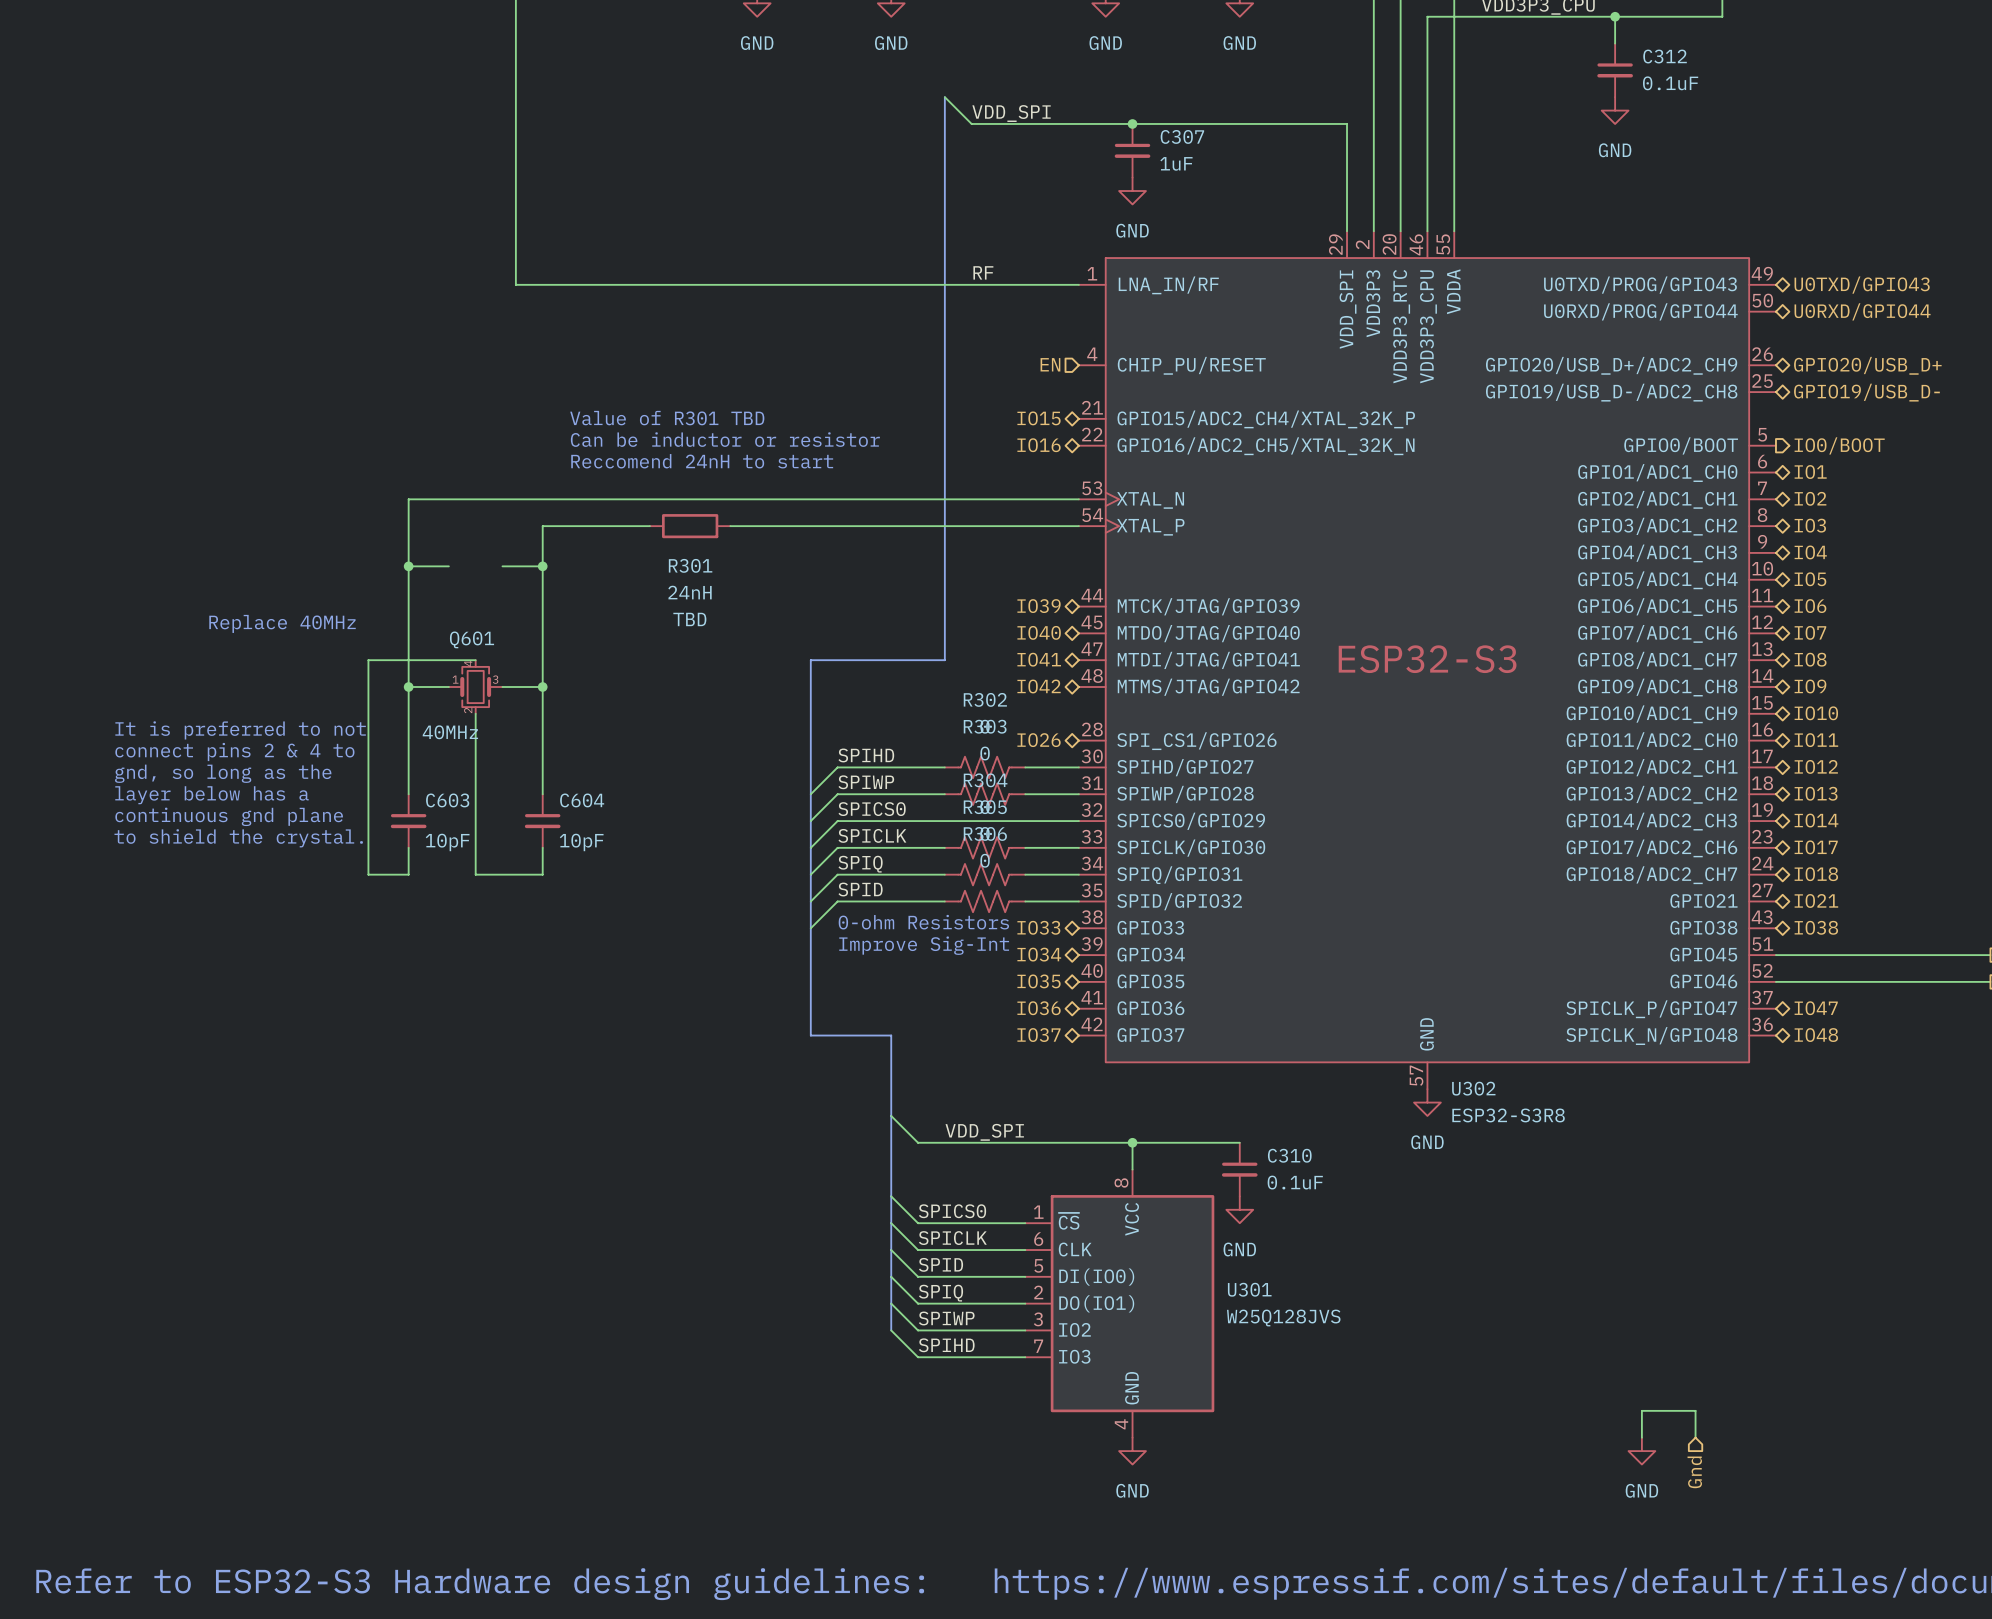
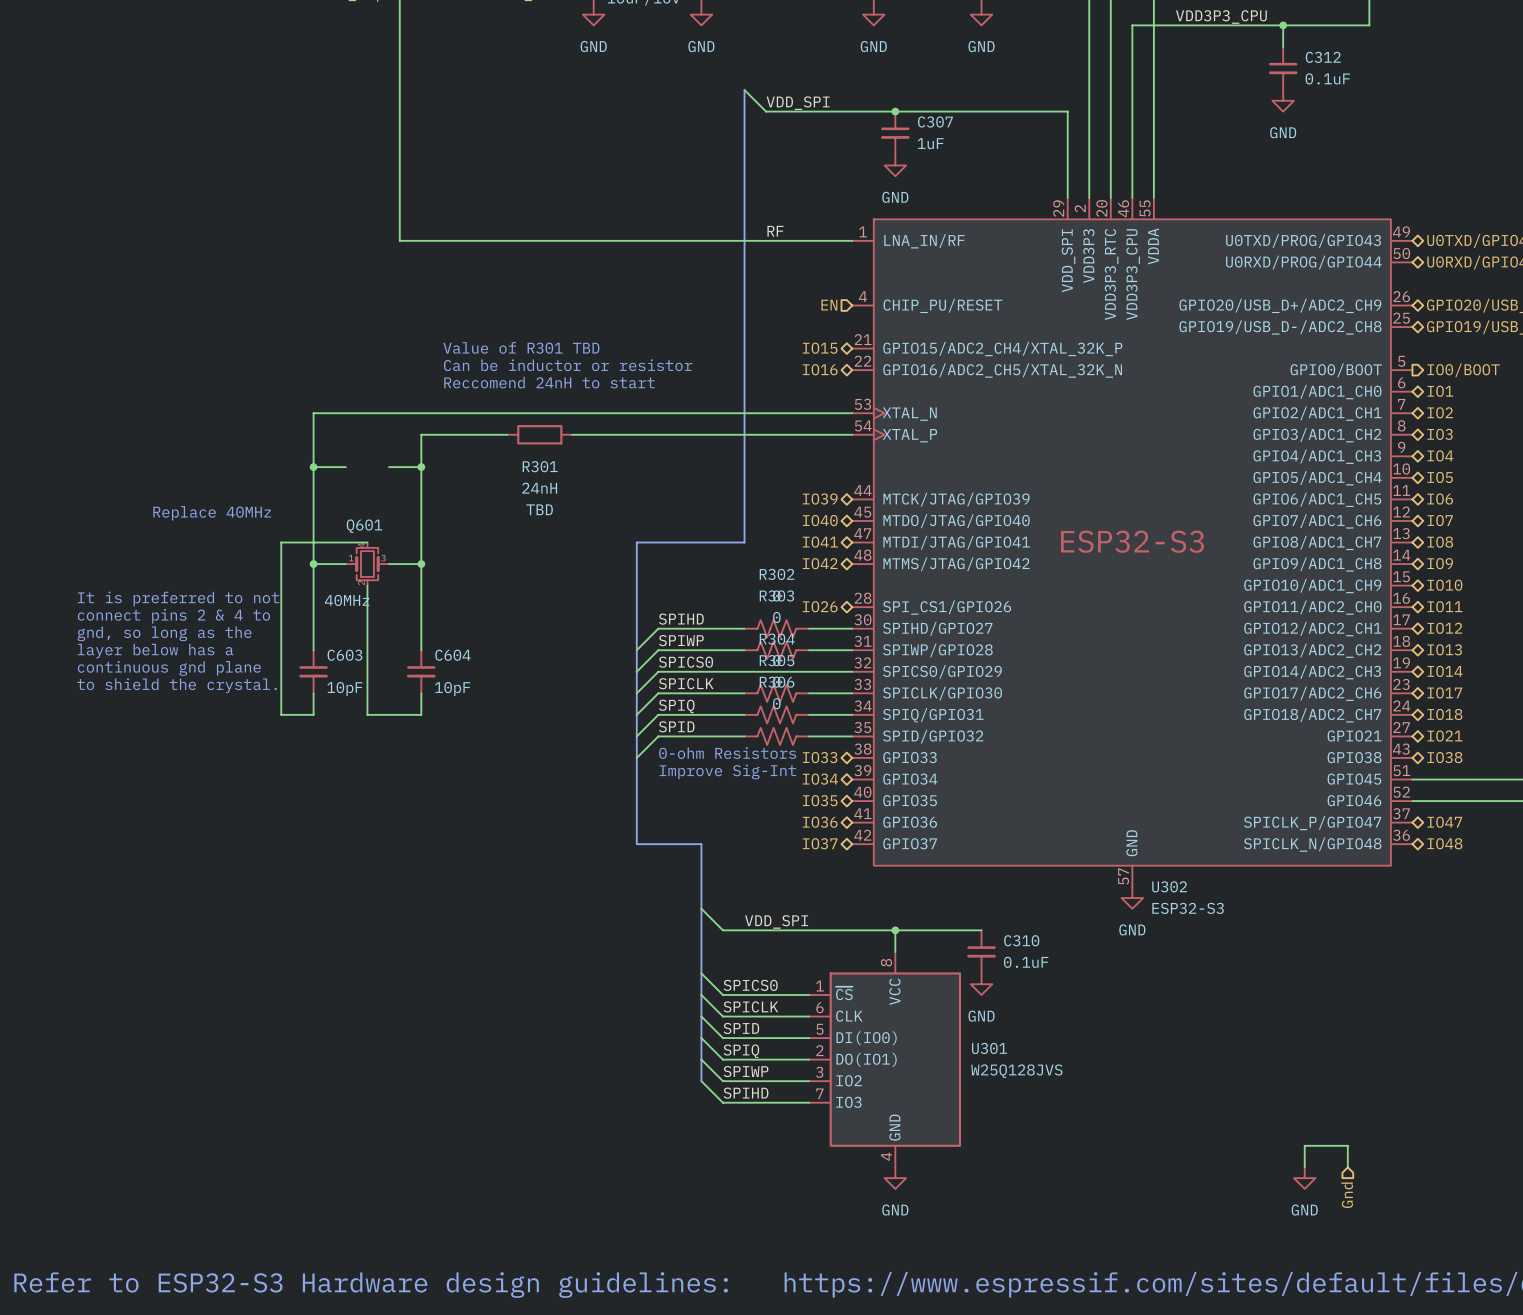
U302 value: ESP32-S3R8 (1508, 1115) -> ESP32-S3 (1188, 908)

